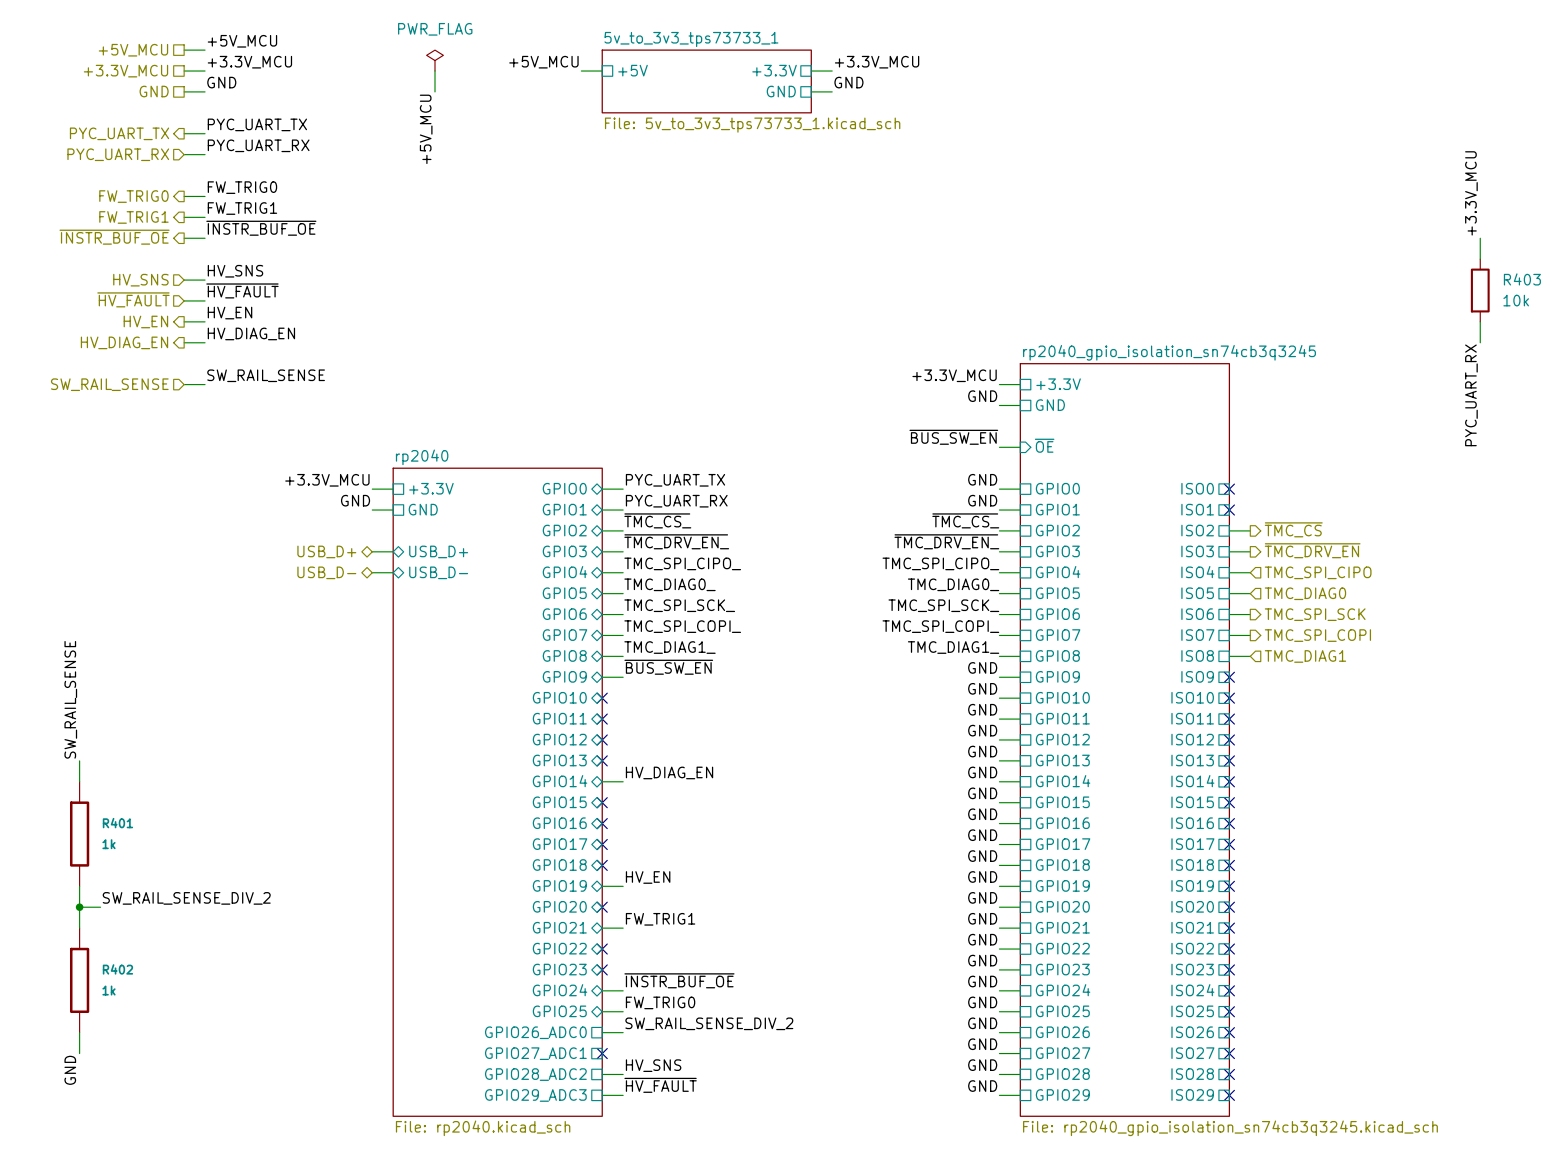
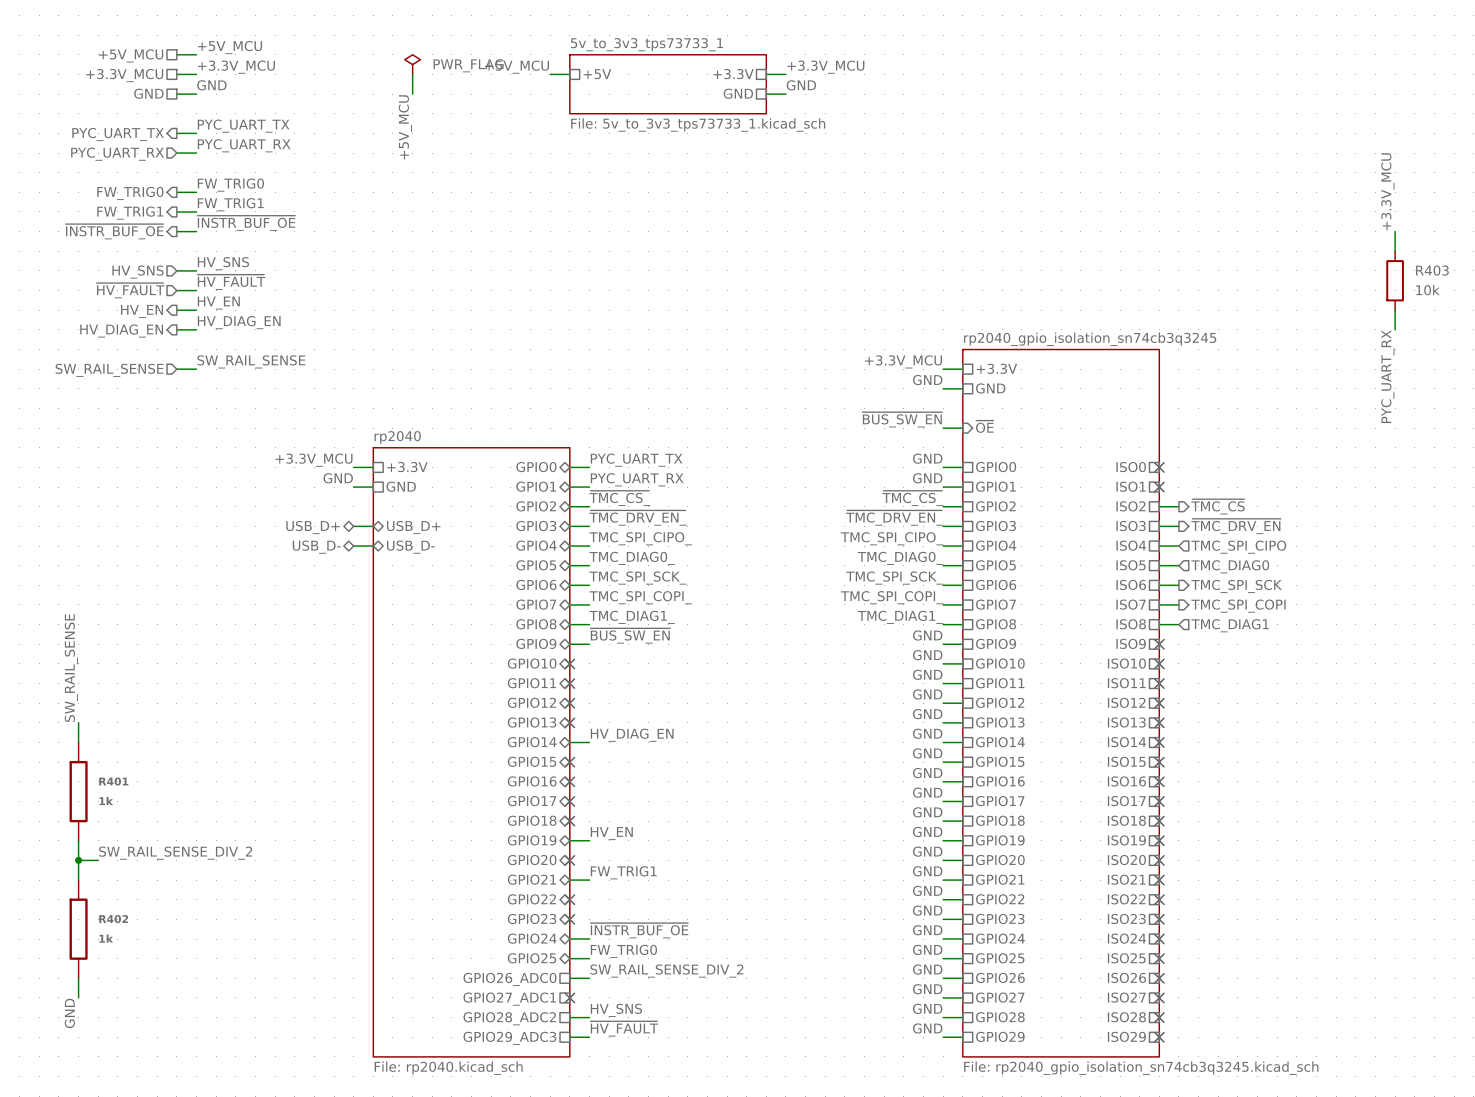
power symbol text position: PWR_FLAG (435, 29) -> PWR_FLAG (468, 65)

